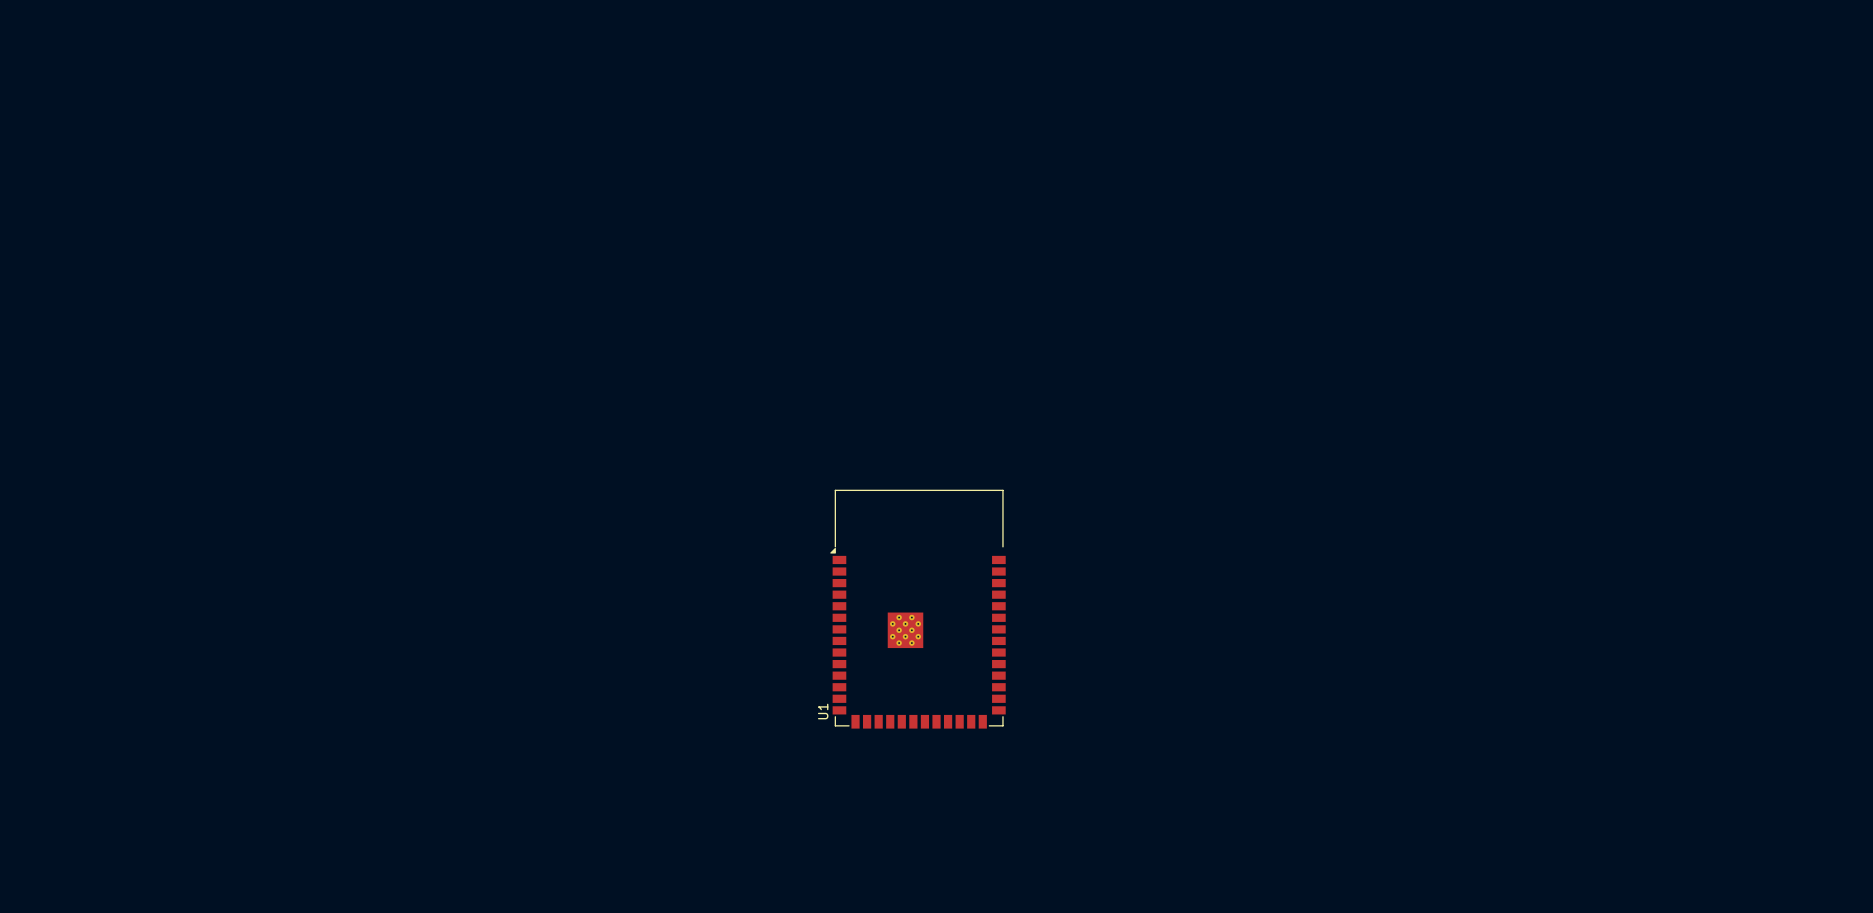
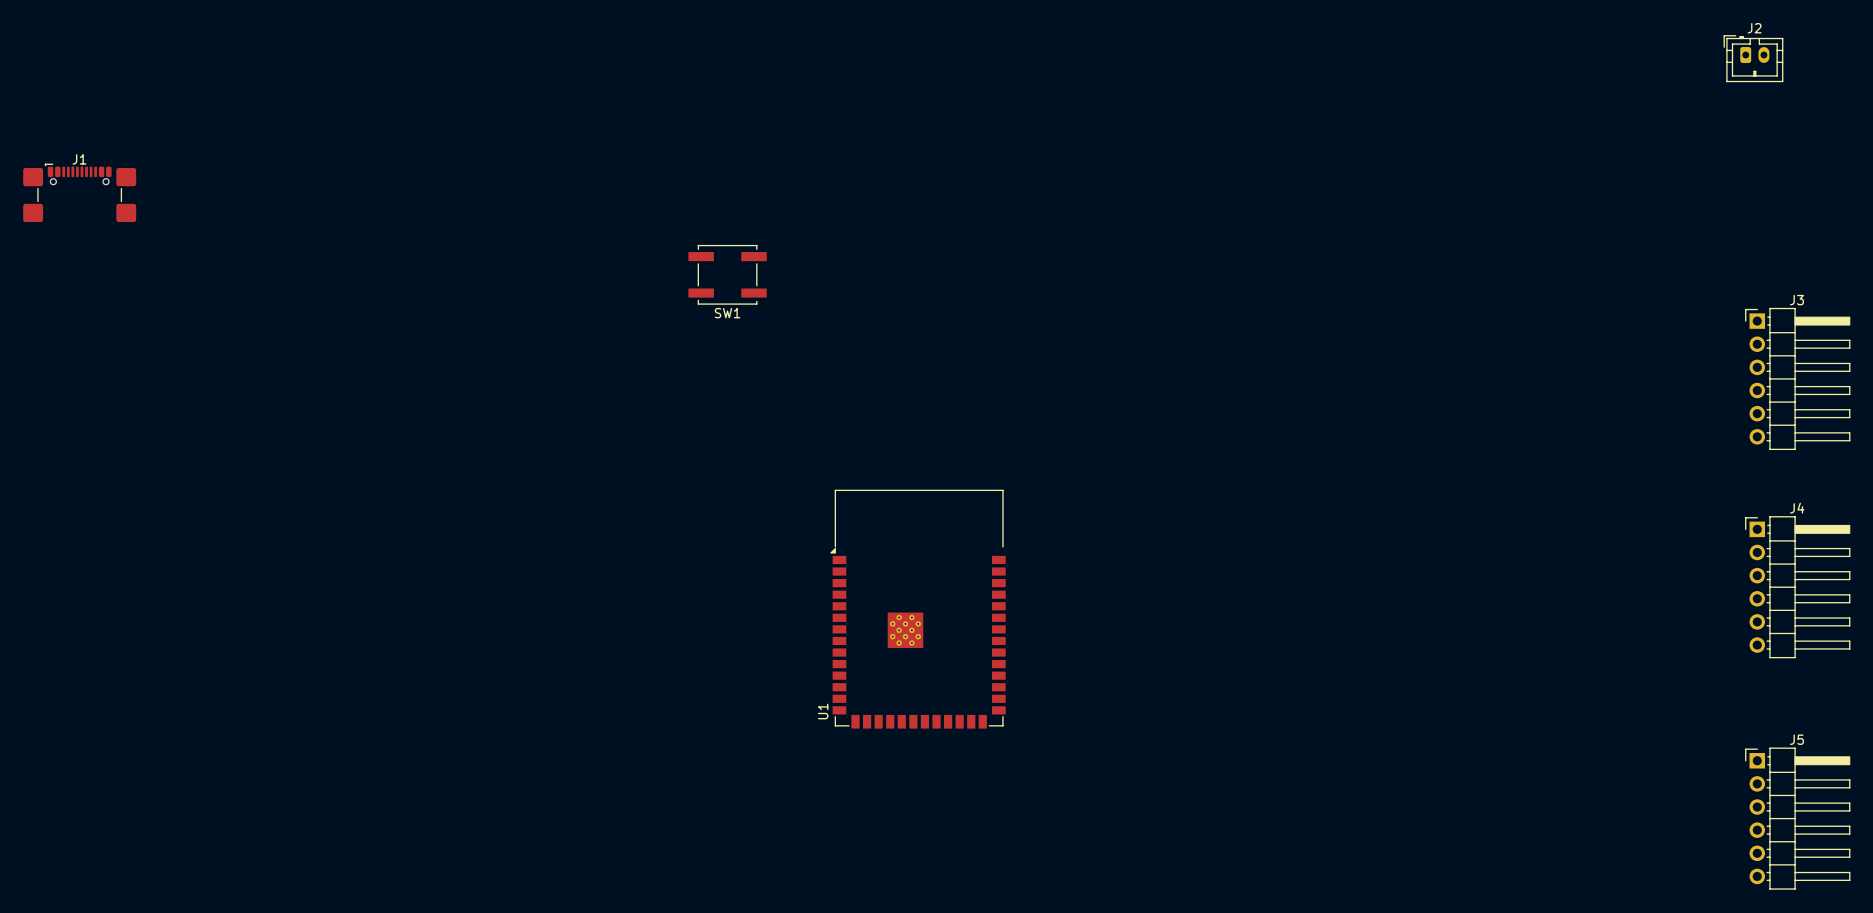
J2: none -> (1753, 58)
J1: none -> (79, 192)
SW1: none -> (727, 274)
J3: none -> (1797, 378)
J4: none -> (1797, 587)
J5: none -> (1797, 818)

